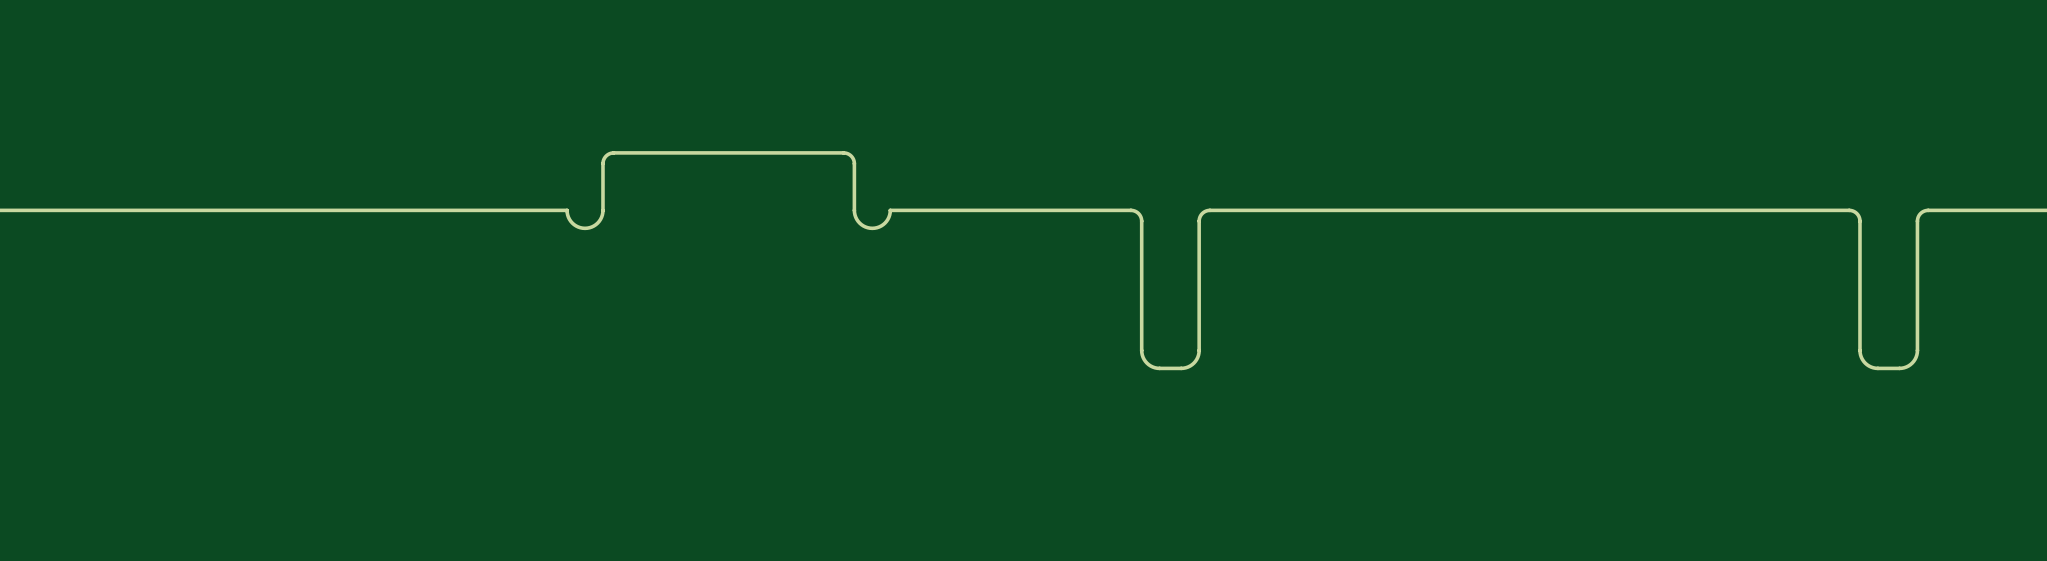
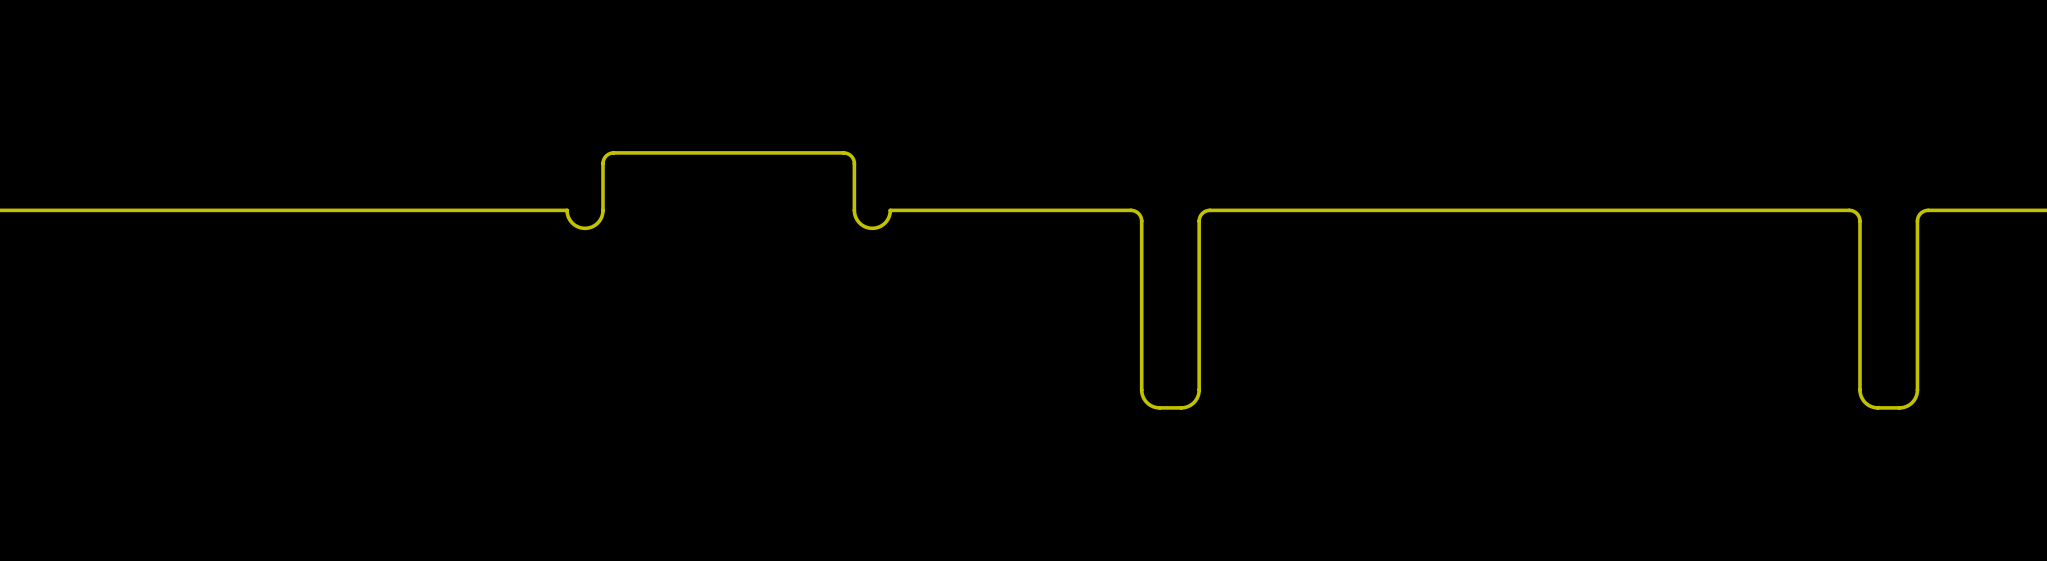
board edge: (1141, 350) (1146, 363) (1159, 368) (1188, 367) (1195, 361) (1199, 350) -> (1141, 350) (1142, 394) (1148, 404) (1159, 407) (1183, 407) (1195, 400) (1199, 392) (1199, 350)
board edge: (1859, 350) (1865, 363) (1877, 368) (1906, 367) (1913, 361) (1917, 350) -> (1859, 350) (1860, 394) (1867, 404) (1877, 407) (1901, 407) (1913, 400) (1917, 392) (1917, 350)

